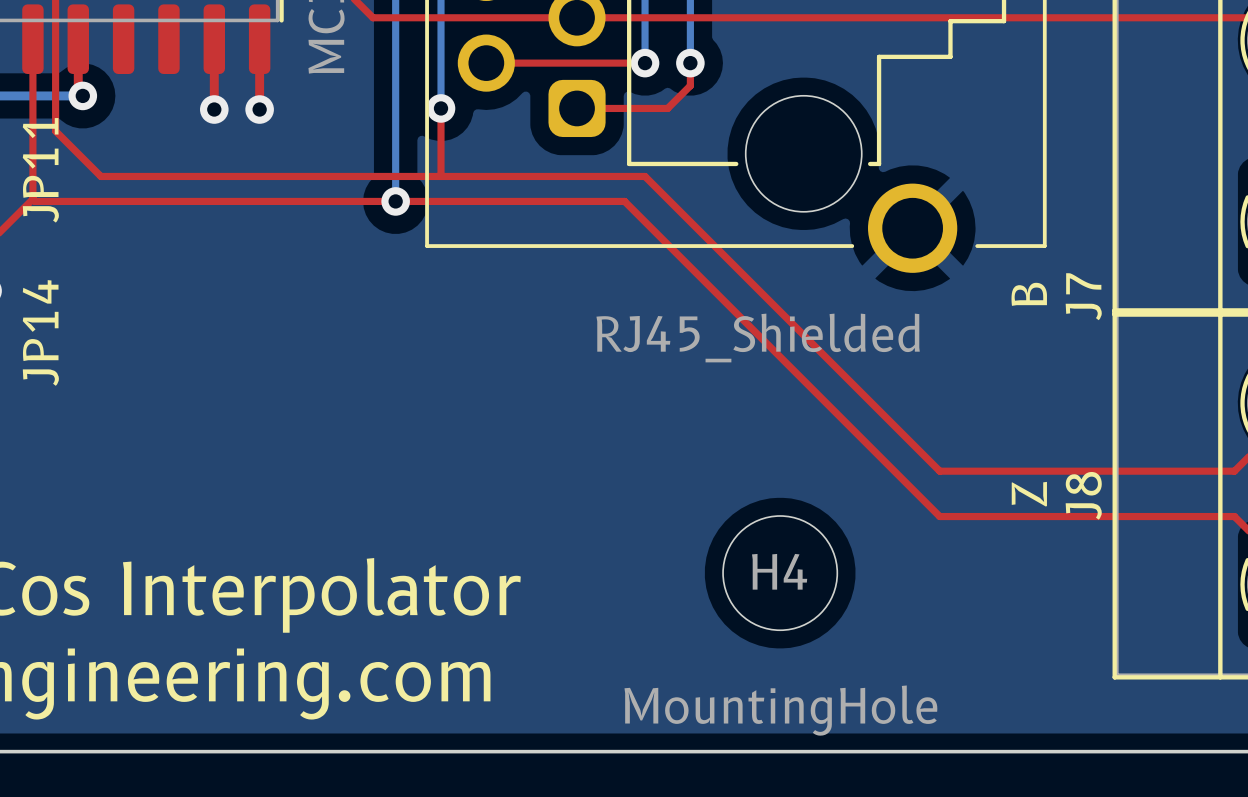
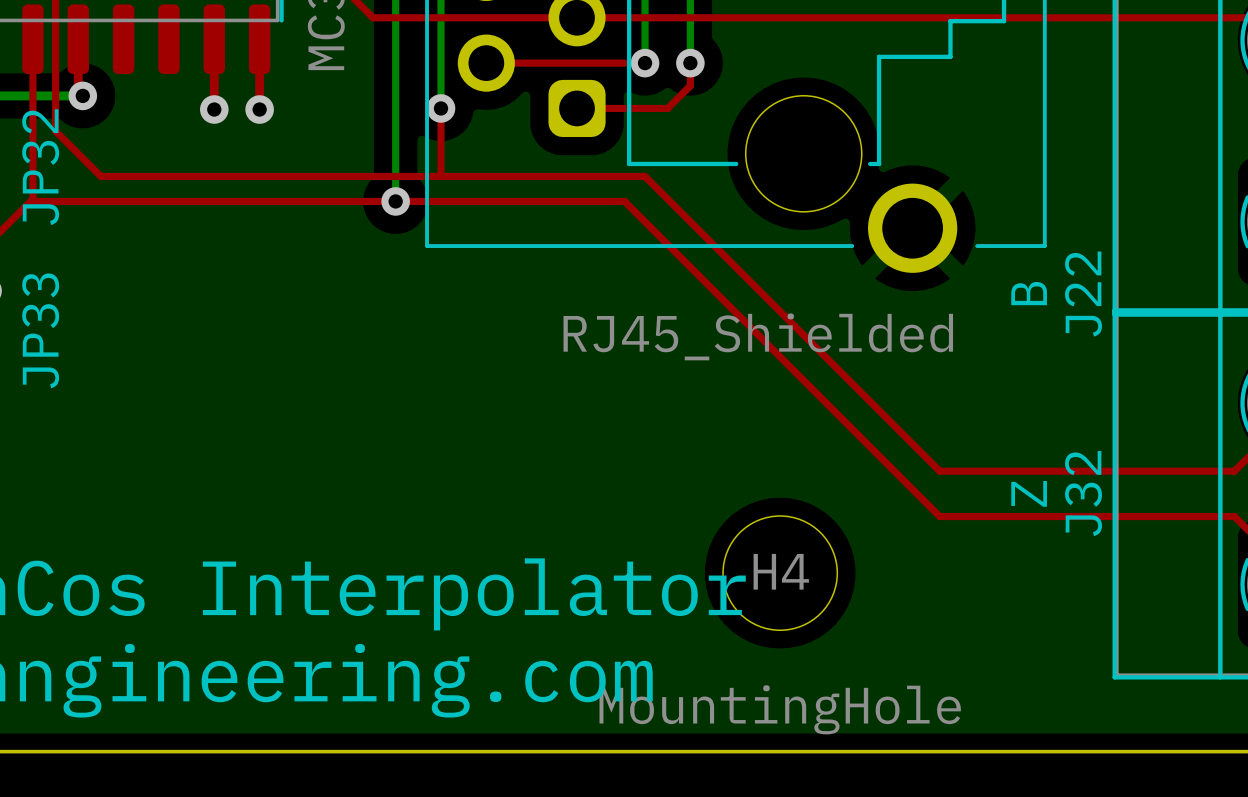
JP11 name: JP11 (40, 170) -> JP32 (40, 167)
J7 name: J7 (1083, 296) -> J22 (1083, 294)
JP14 name: JP14 (40, 332) -> JP33 (40, 330)
J8 name: J8 (1083, 495) -> J32 (1083, 493)

